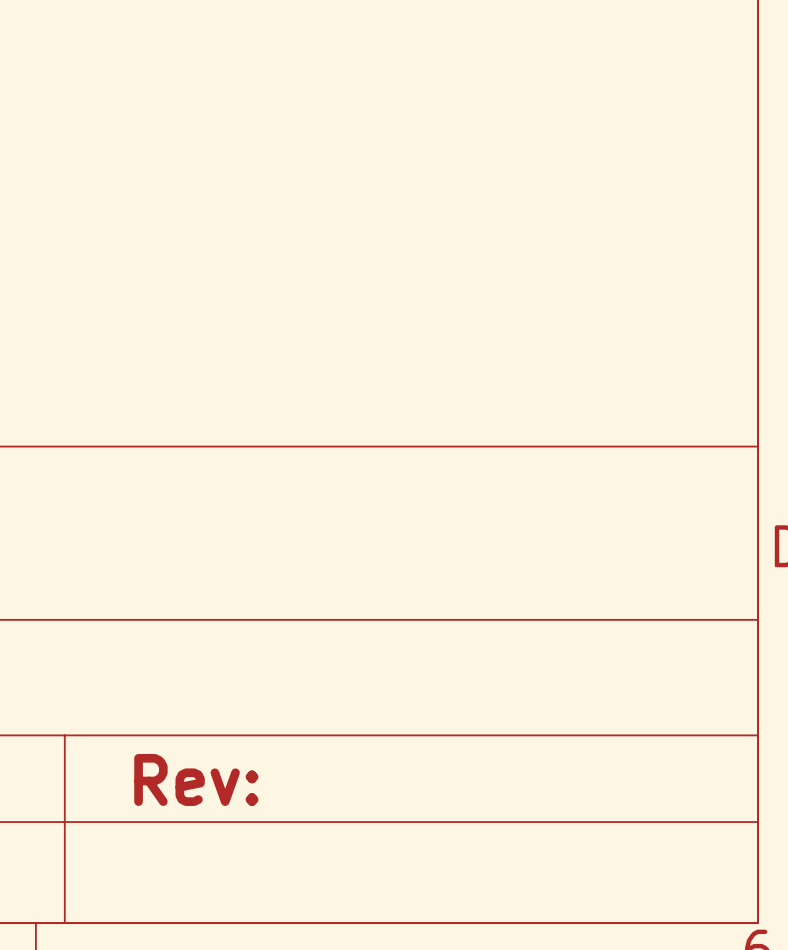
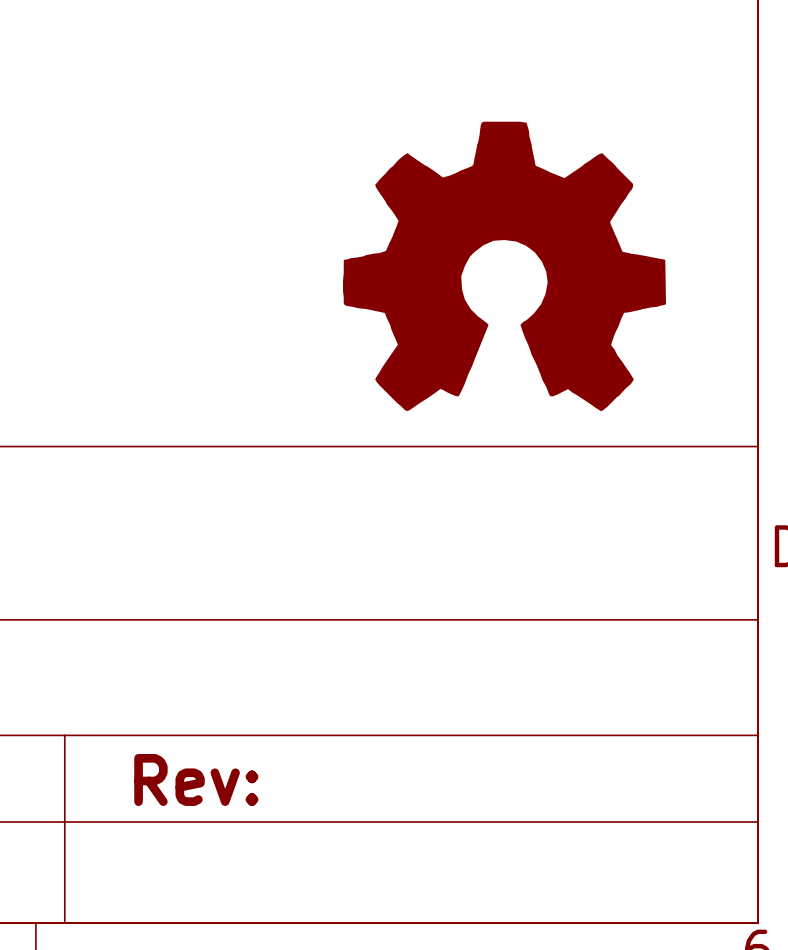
power symbol: none -> (504, 266)

